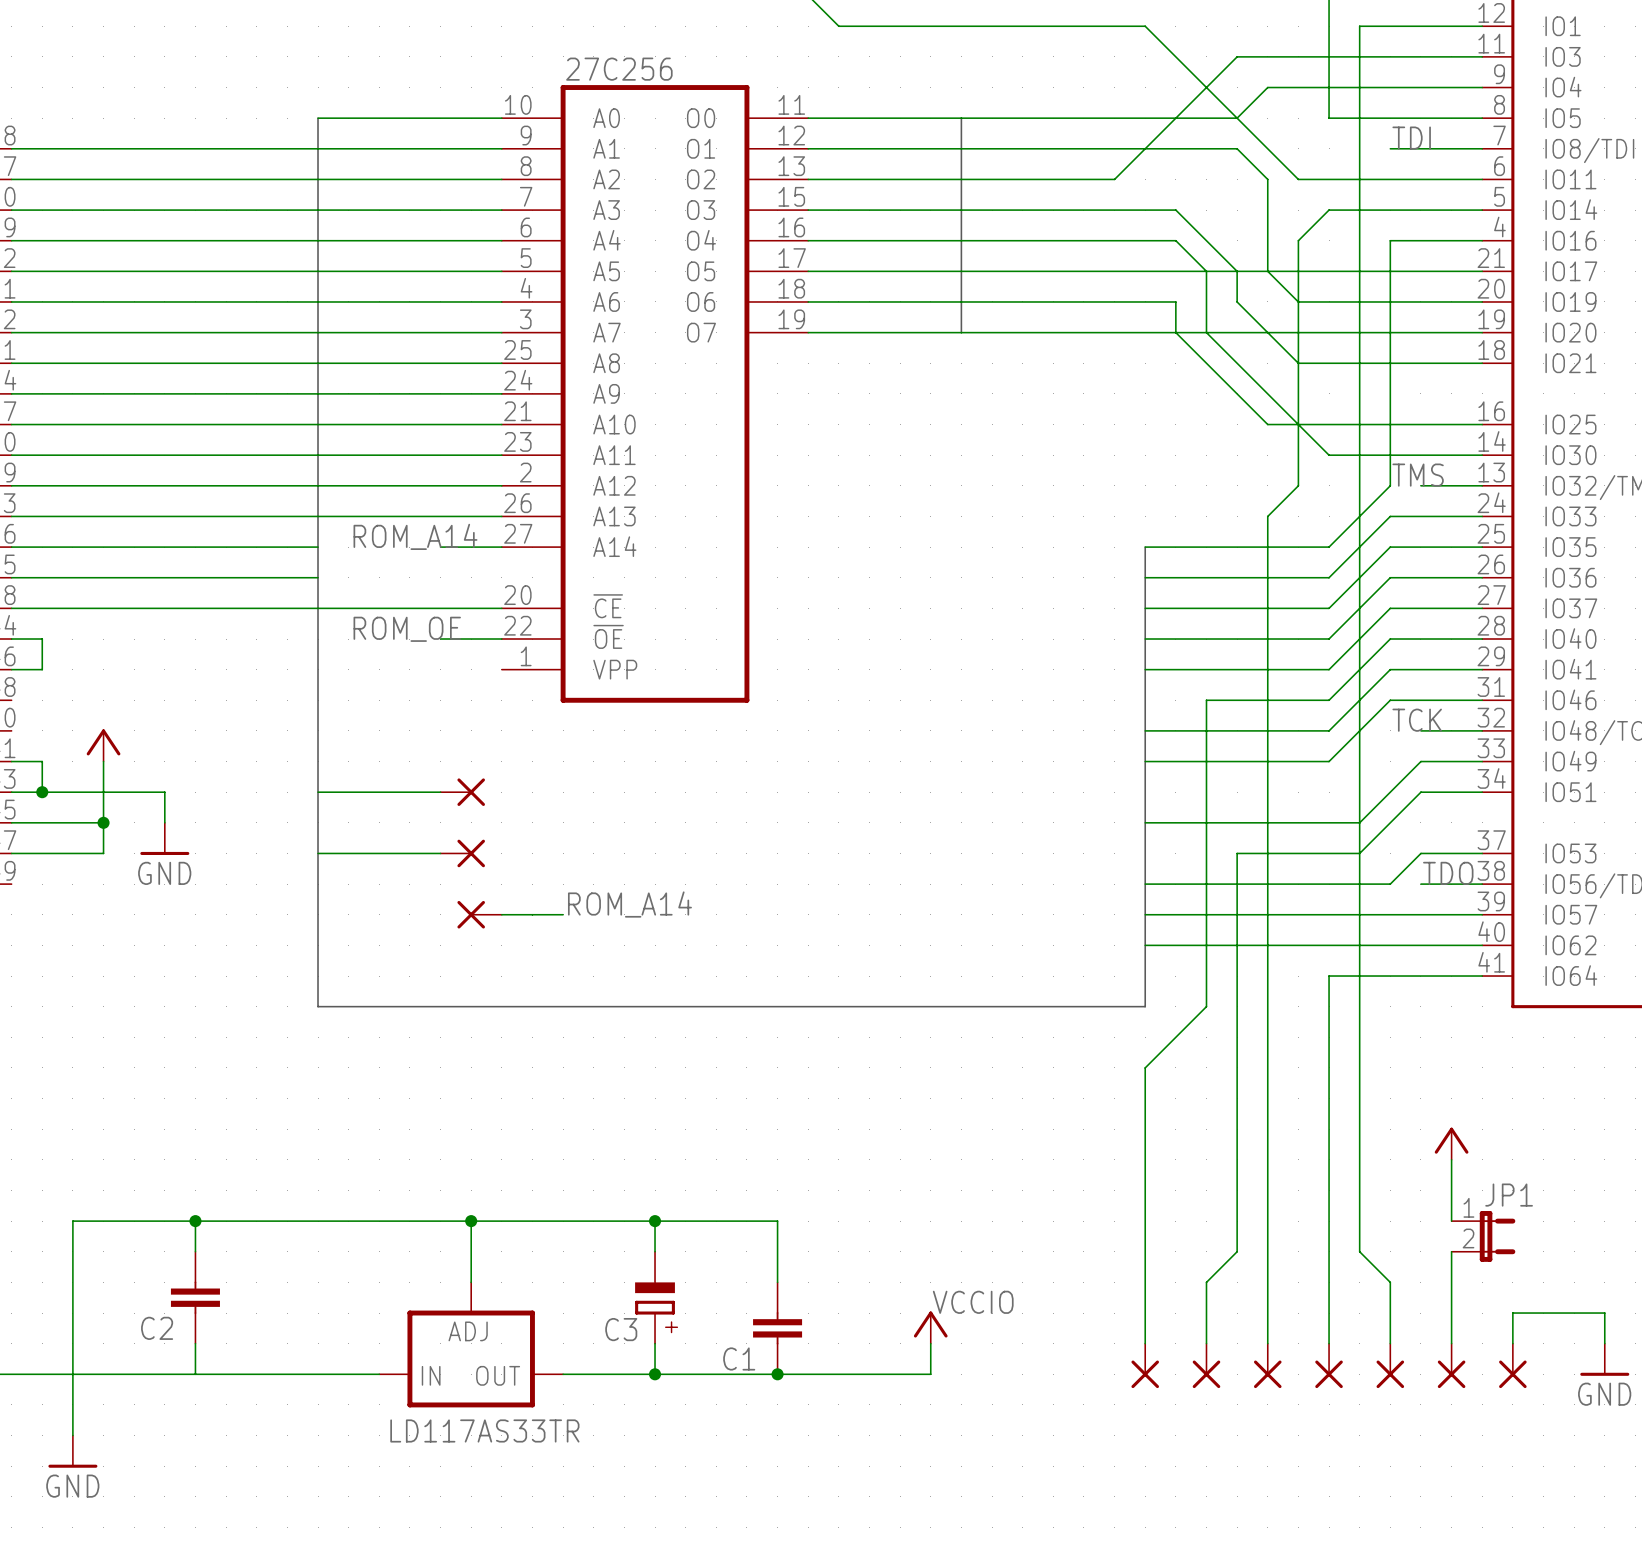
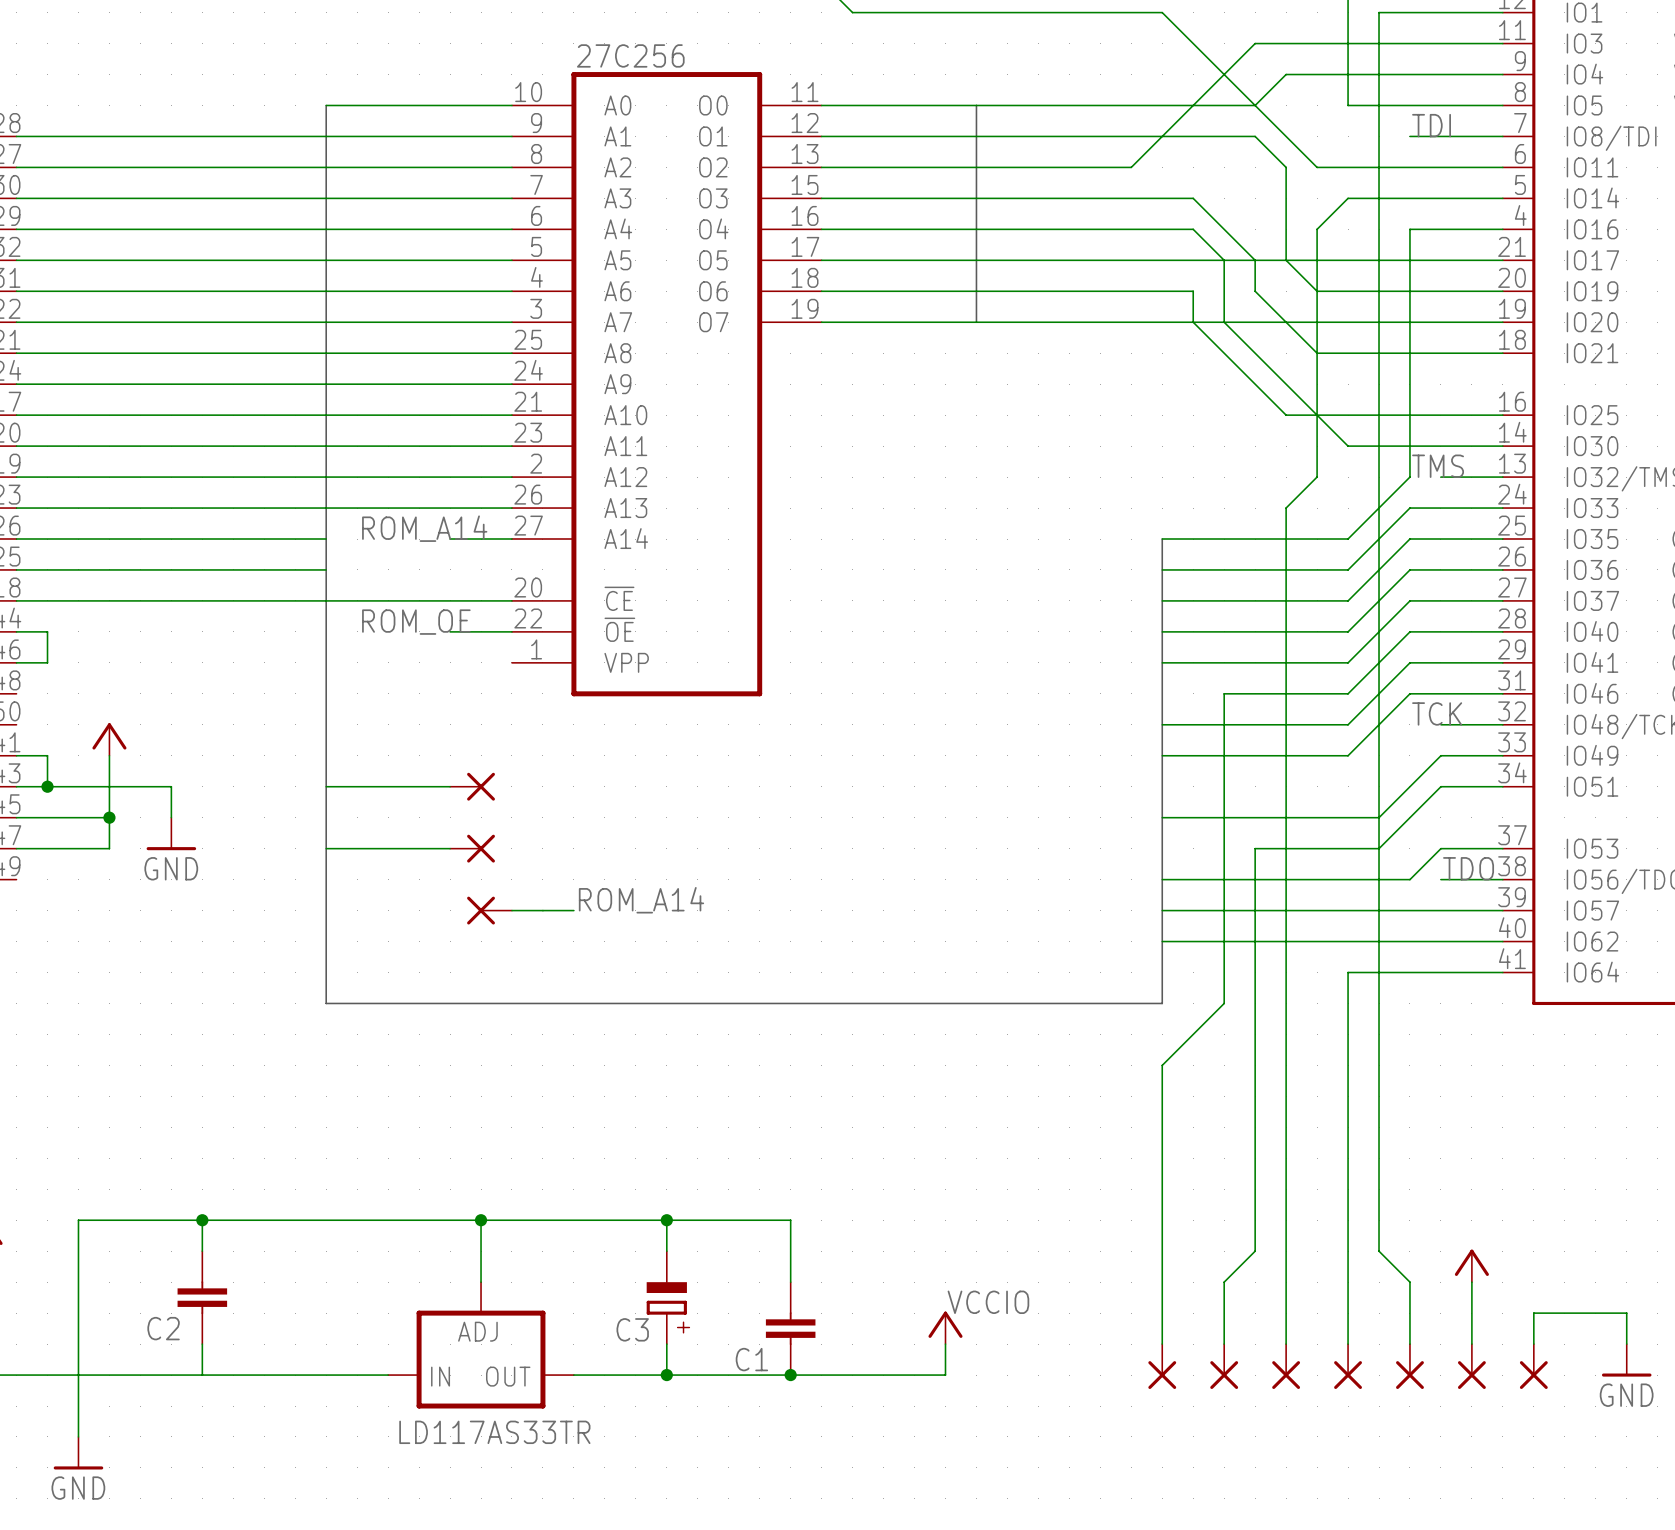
power symbol position: (1451, 1143) -> (1471, 1265)
wire: (1451, 1159) (1451, 1221) -> none
JP1: (1483, 1236) -> none

